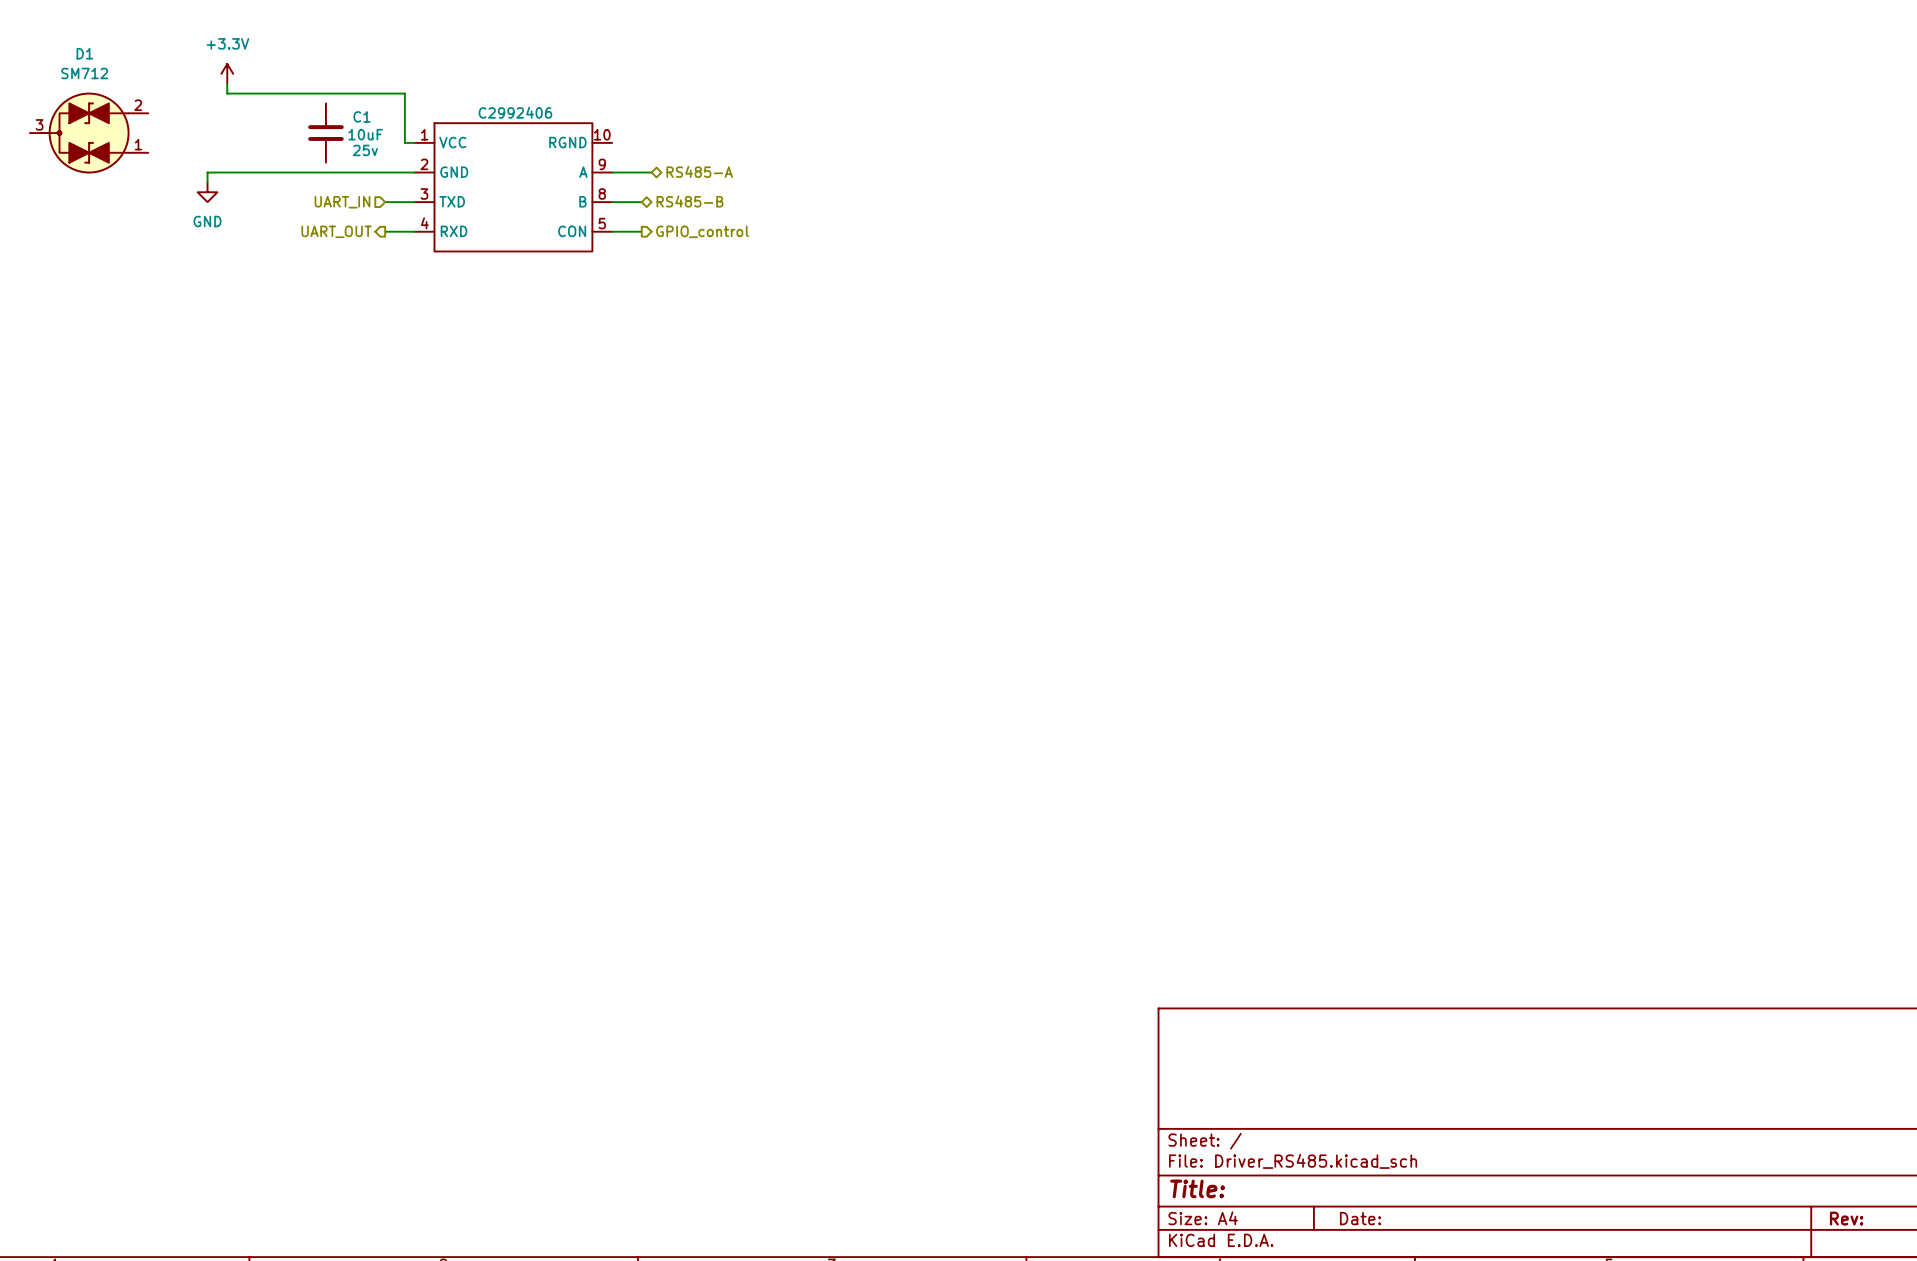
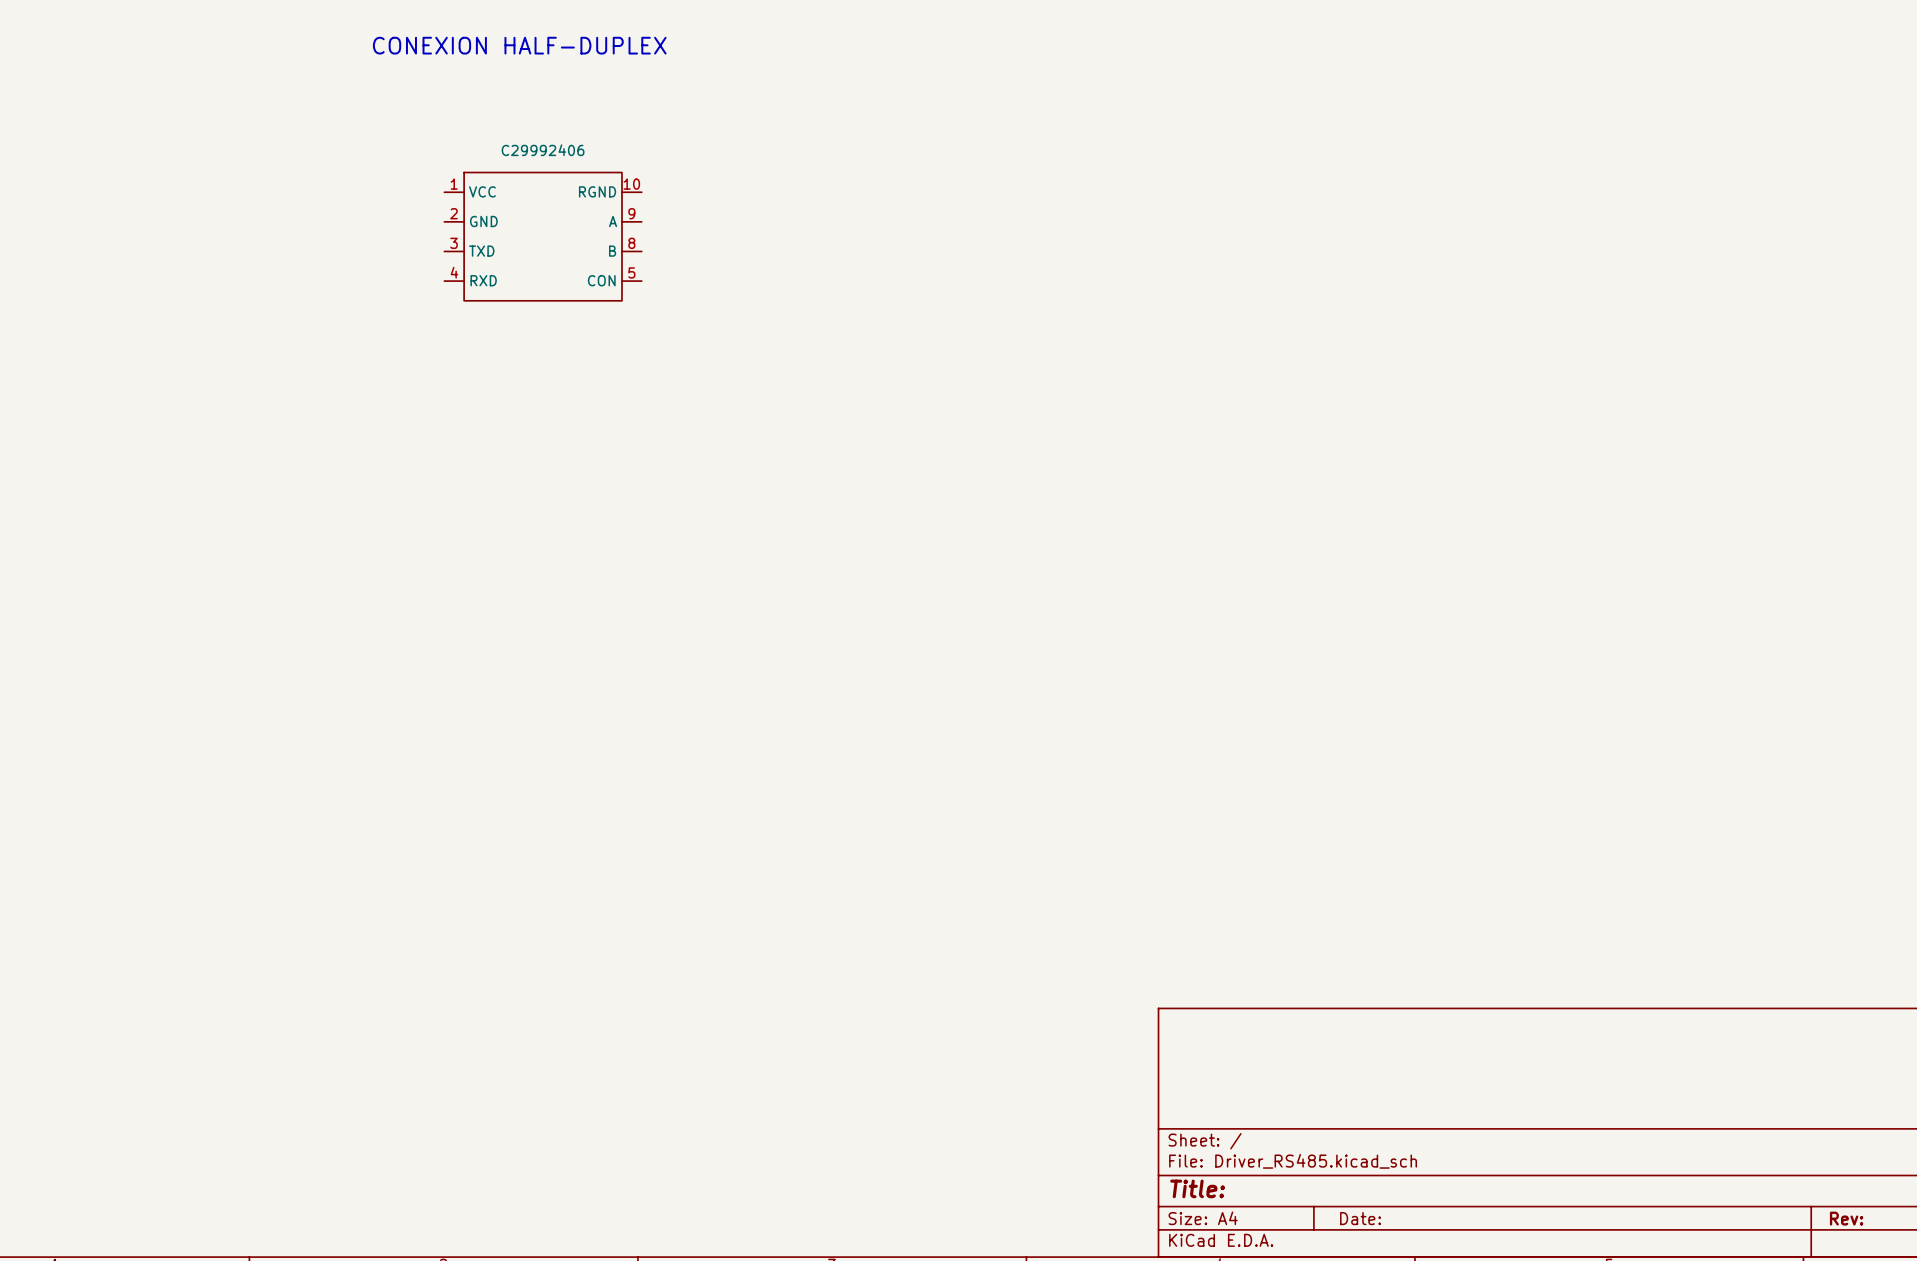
text: none -> CONEXION HALF-DUPLEX (519, 45)
power symbol: +3.3V (227, 73) -> none
wire: (227, 83) (227, 93) (404, 93) (404, 142) (414, 142) -> none
D1: SM712 (89, 133) -> none
C1: (325, 133) -> none
hierarchical label: RS485-A (699, 171) -> none
wire: (414, 172) (207, 172) (207, 182) -> none
wire: (612, 172) (651, 172) -> none
C2992406: (513, 187) -> none
power symbol: GND (207, 192) -> none
hierarchical label: RS485-B (690, 201) -> none
hierarchical label: UART_IN (342, 202) -> none
wire: (385, 202) (414, 202) -> none
wire: (612, 202) (641, 202) -> none
hierarchical label: UART_OUT (336, 231) -> none
wire: (385, 231) (414, 231) -> none
wire: (612, 231) (641, 231) -> none
hierarchical label: GPIO_control (702, 231) -> none
C29992406: none -> (543, 236)

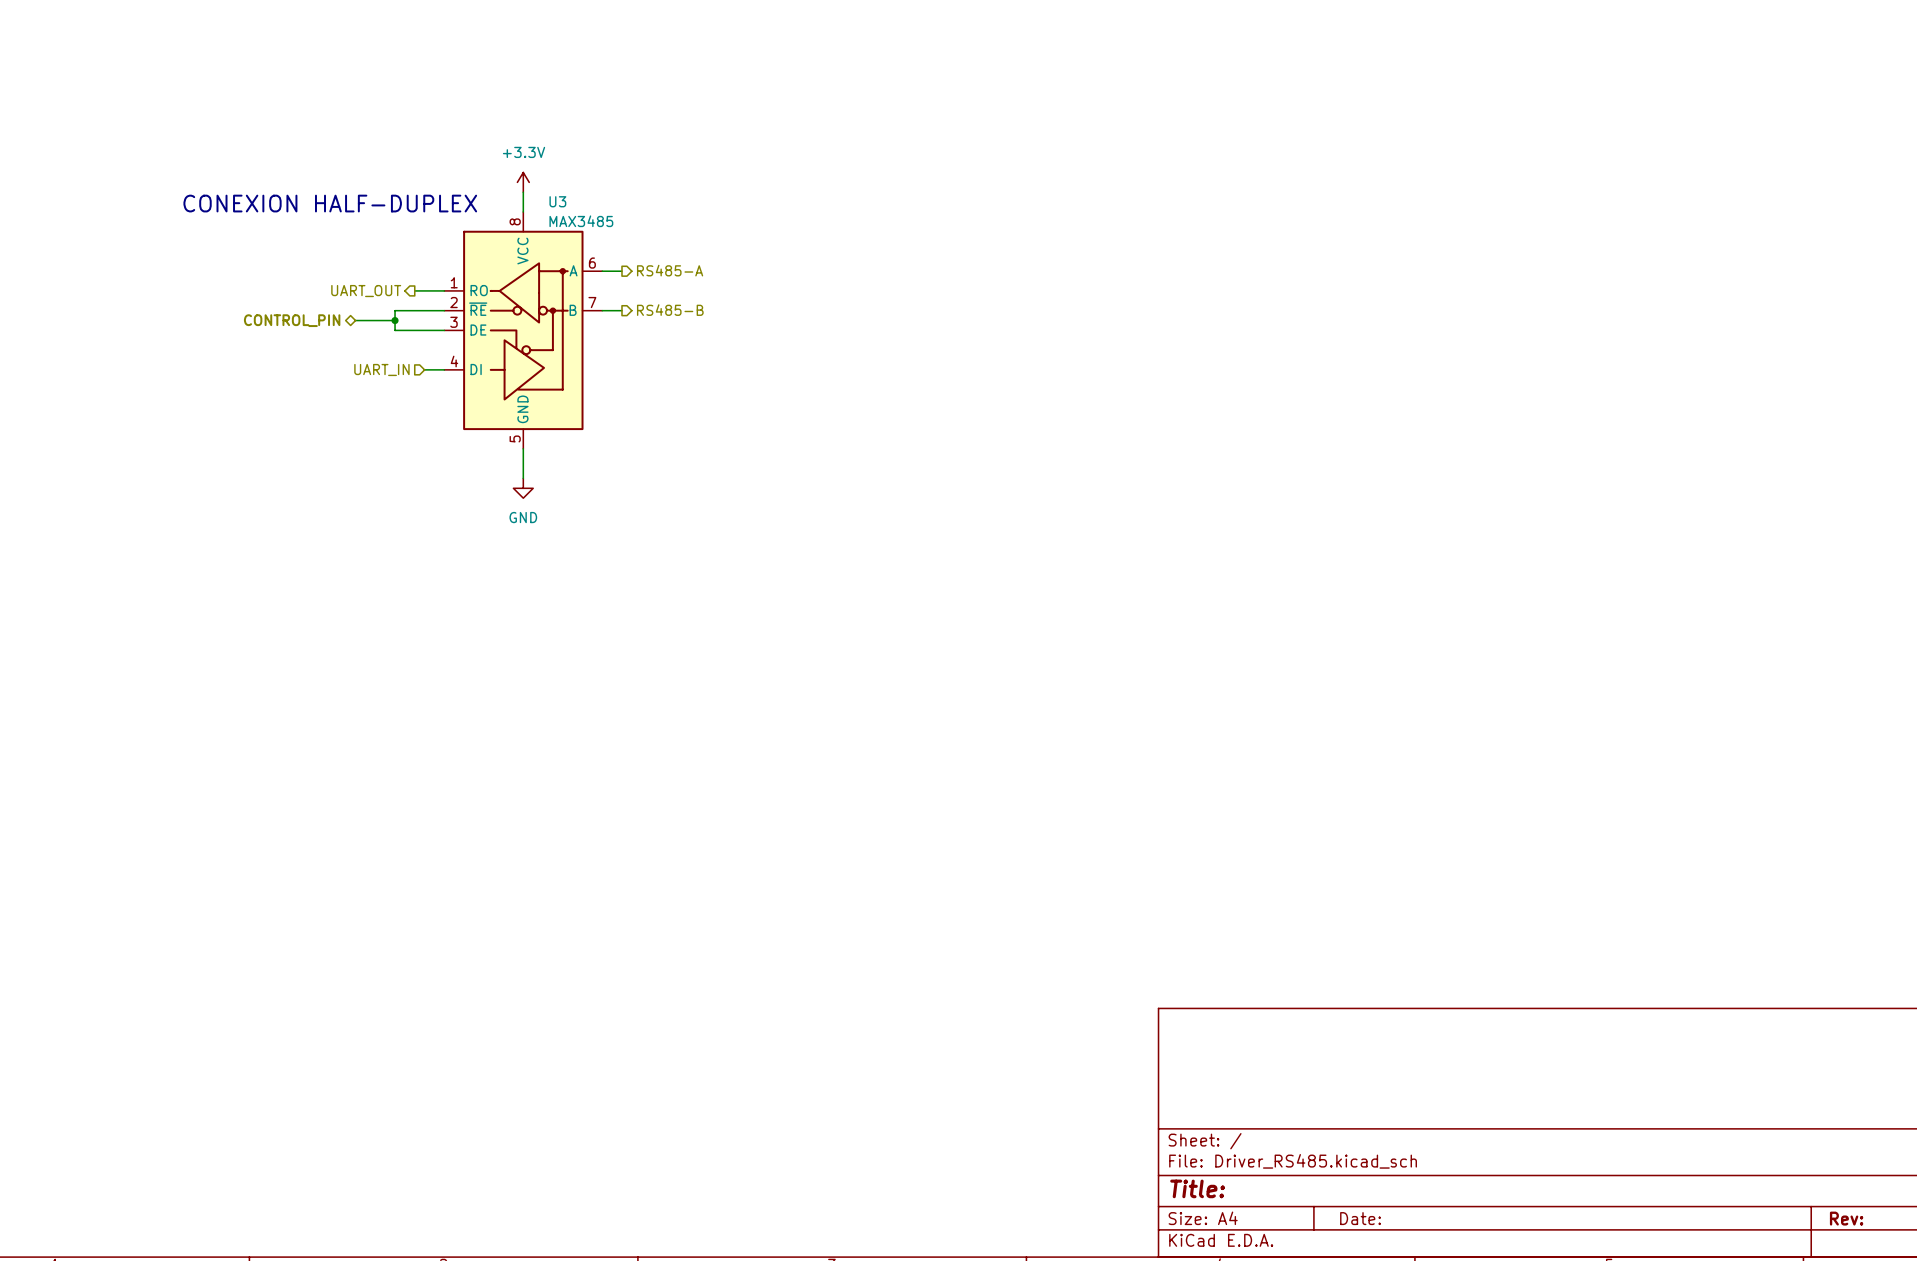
text: CONEXION HALF-DUPLEX (519, 45) -> none
power symbol: none -> +3.3V (523, 182)
wire: none -> (523, 192) (523, 211)
text: none -> CONEXION HALF-DUPLEX (330, 203)
C29992406: (543, 236) -> none
hierarchical label: none -> RS485-A (670, 270)
wire: none -> (602, 271) (621, 271)
wire: none -> (414, 290) (444, 290)
hierarchical label: none -> UART_OUT (366, 291)
wire: none -> (444, 310) (395, 310) (395, 330) (444, 330)
wire: none -> (602, 310) (621, 310)
hierarchical label: none -> RS485-B (670, 310)
hierarchical label: none -> CONTROL_PIN (292, 320)
wire: none -> (355, 320) (395, 320)
junction: none -> (395, 320)
U3: none -> MAX3485 (523, 330)
hierarchical label: none -> UART_IN (381, 369)
wire: none -> (424, 369) (444, 369)
wire: none -> (523, 448) (523, 478)
power symbol: none -> GND (523, 488)

